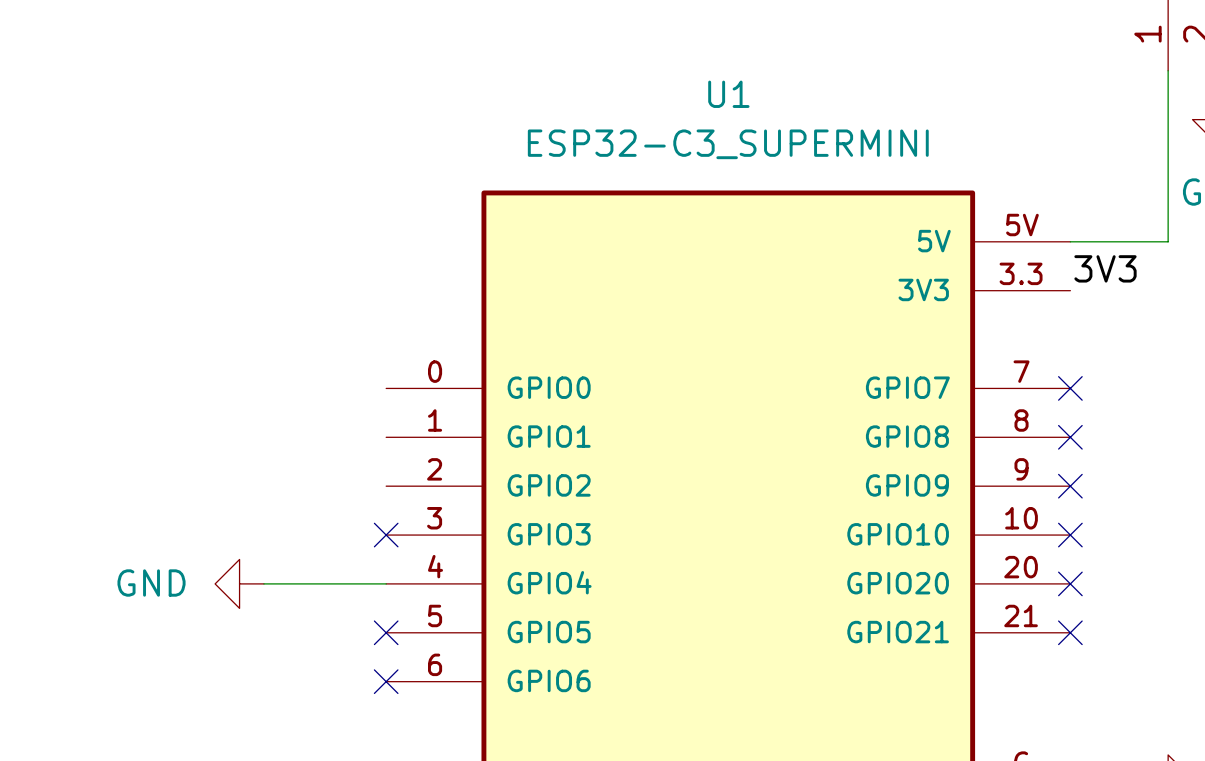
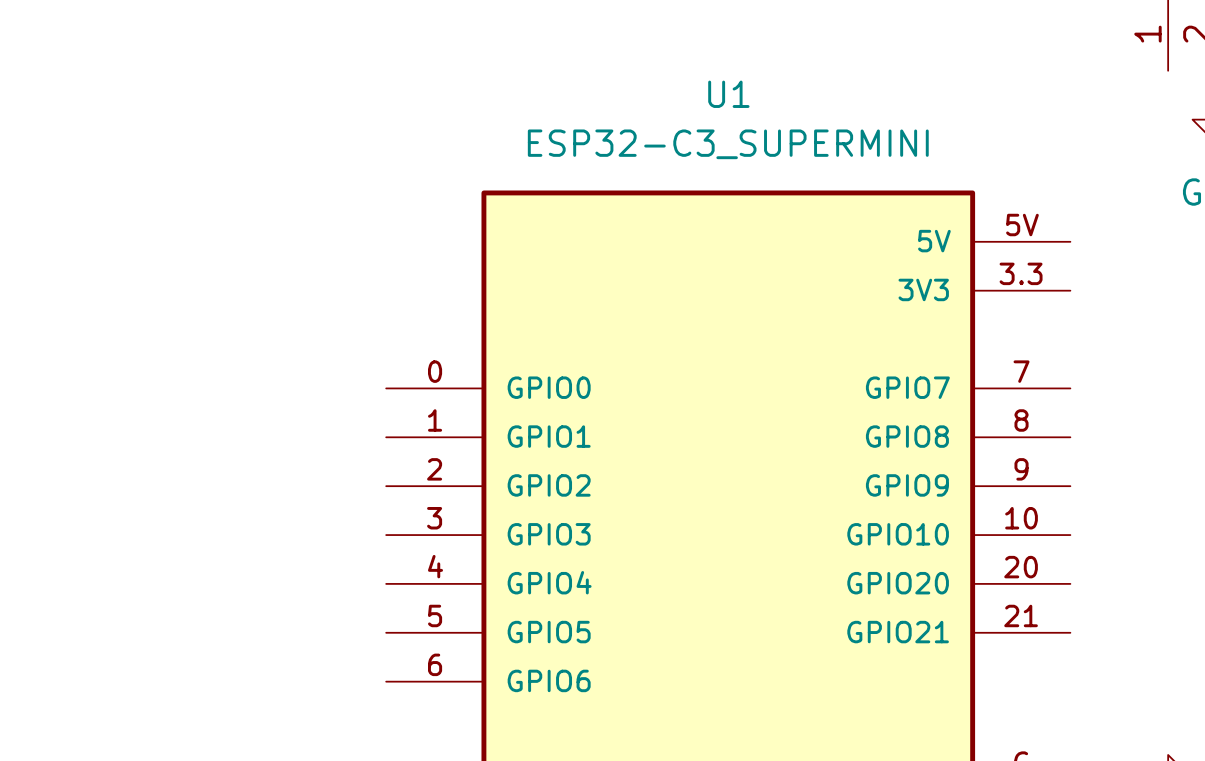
wire: (1168, 70) (1168, 241) (1070, 241) -> none
label: 3V3 (1105, 268) -> none
no-connect mark: (1070, 388) -> none
no-connect mark: (1070, 437) -> none
no-connect mark: (1070, 486) -> none
no-connect mark: (386, 535) -> none
no-connect mark: (1070, 535) -> none
power symbol: GND (239, 583) -> none
wire: (263, 583) (386, 583) -> none
no-connect mark: (1070, 583) -> none
no-connect mark: (386, 632) -> none
no-connect mark: (1070, 632) -> none
no-connect mark: (386, 681) -> none

